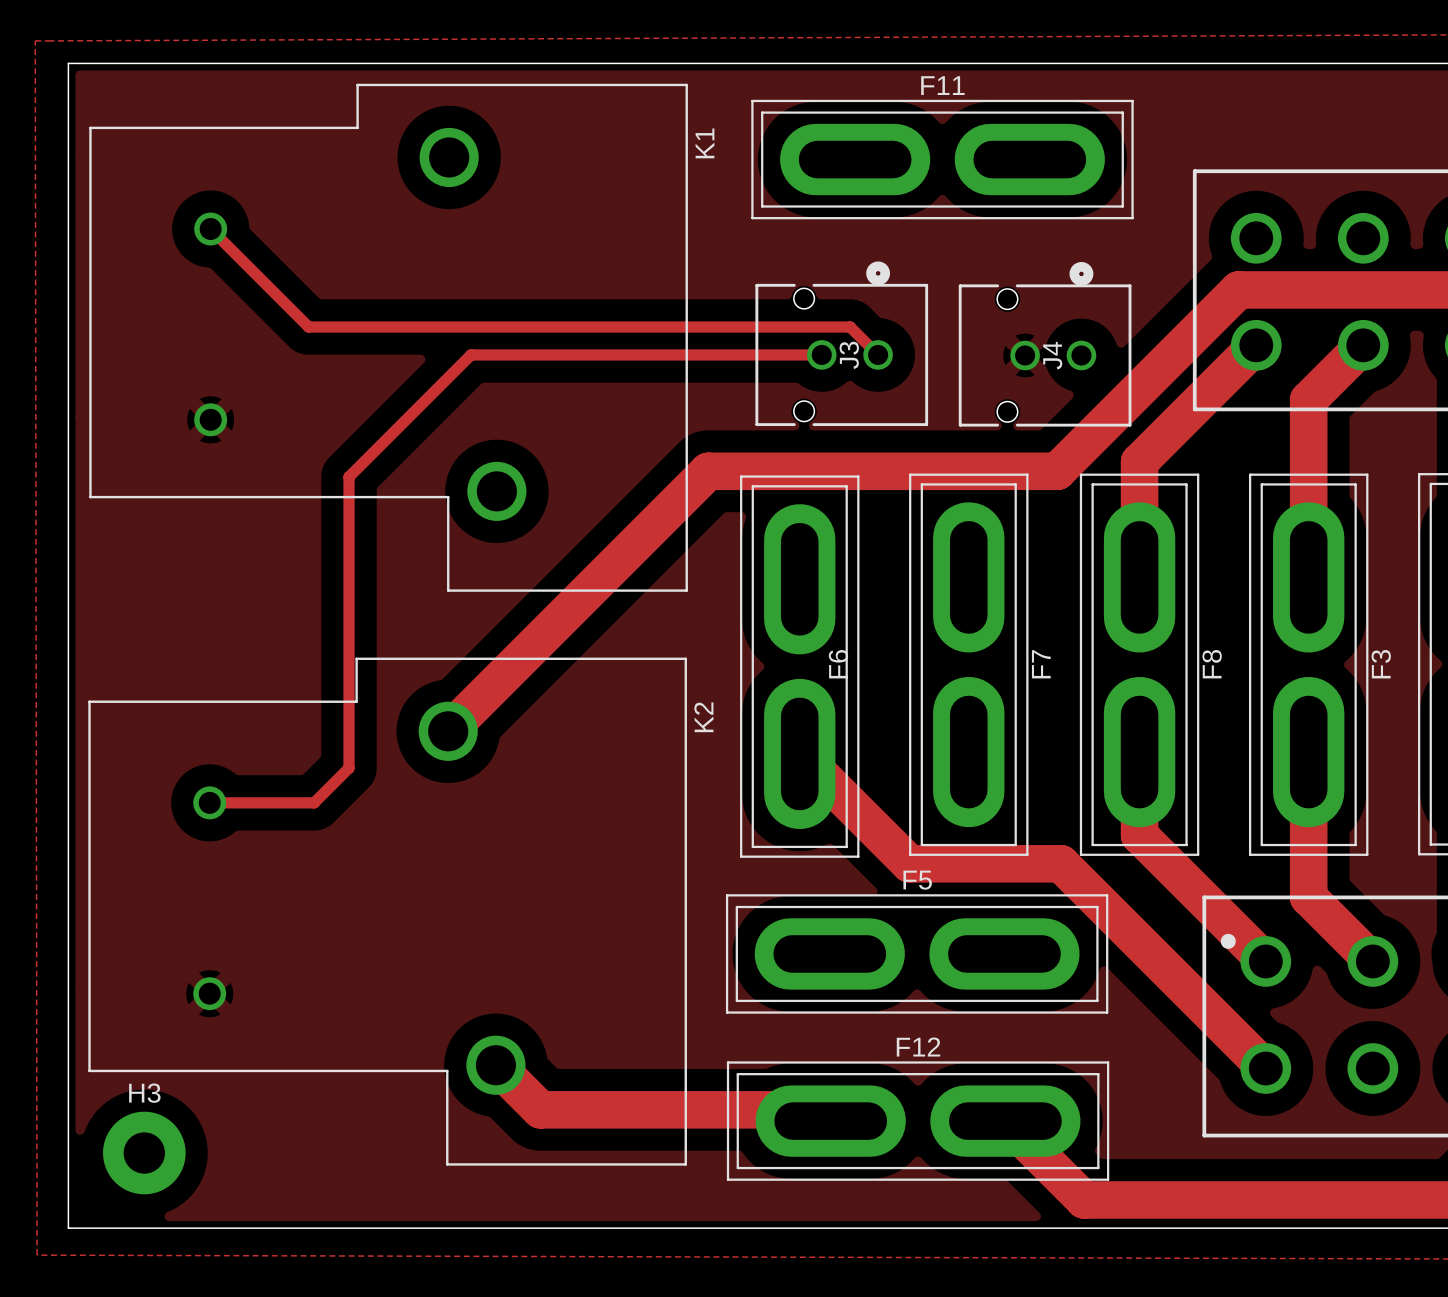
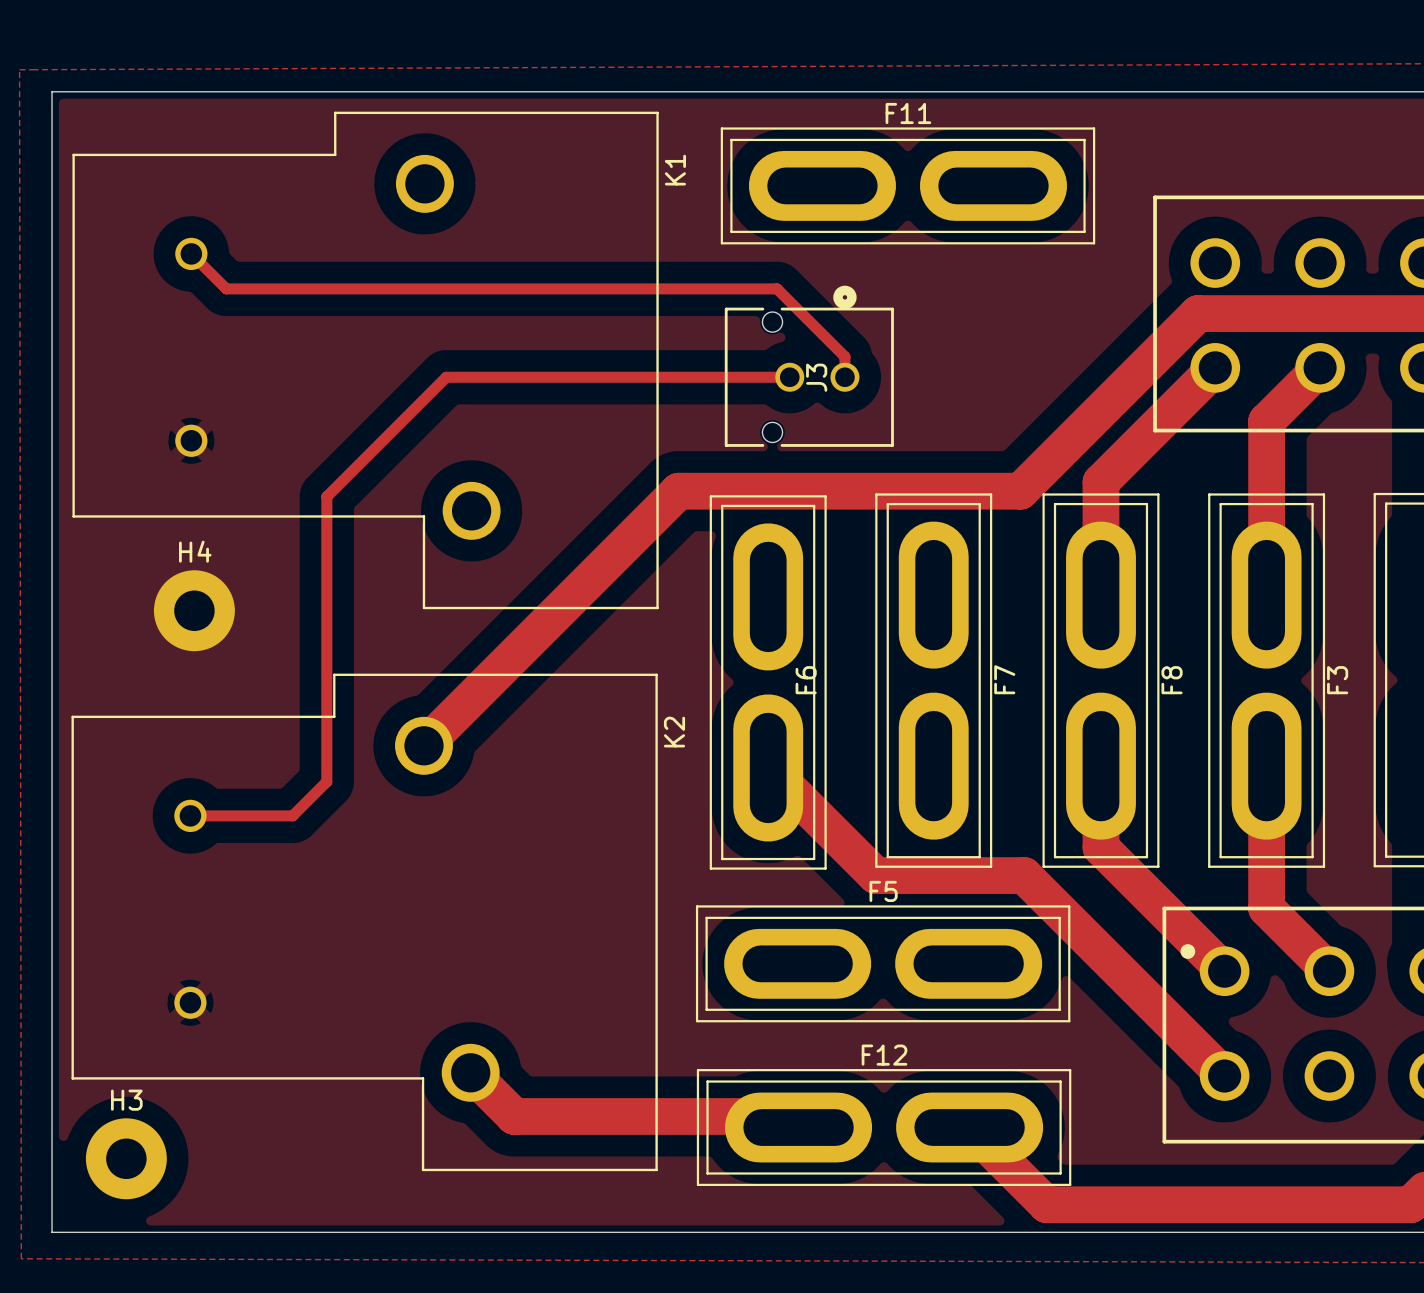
track: (246, 264) (308, 327) (850, 327) (878, 354) -> (226, 288) (777, 288) (844, 356) (844, 377)
J4: (1045, 344) -> none
H4: none -> (194, 610)

